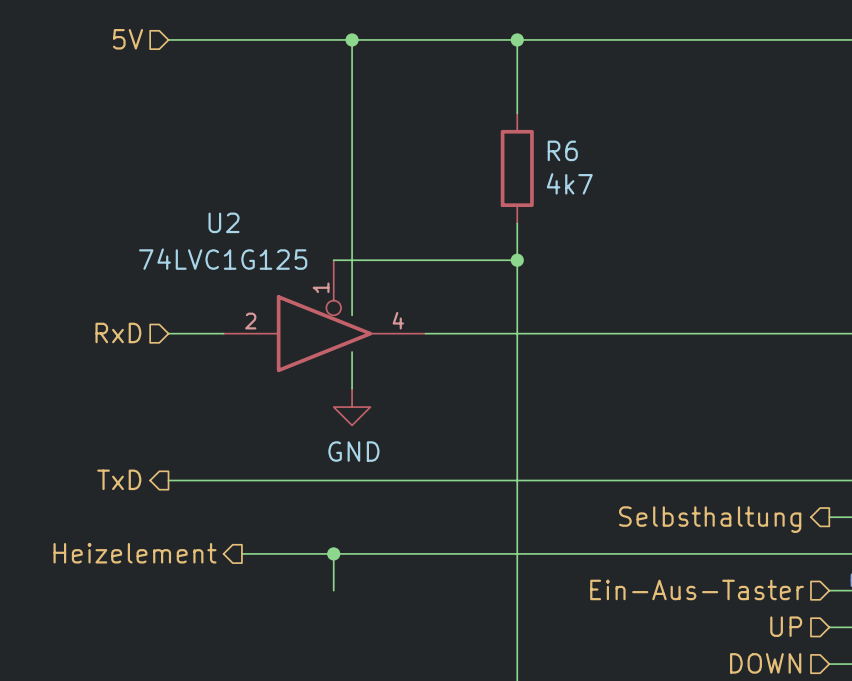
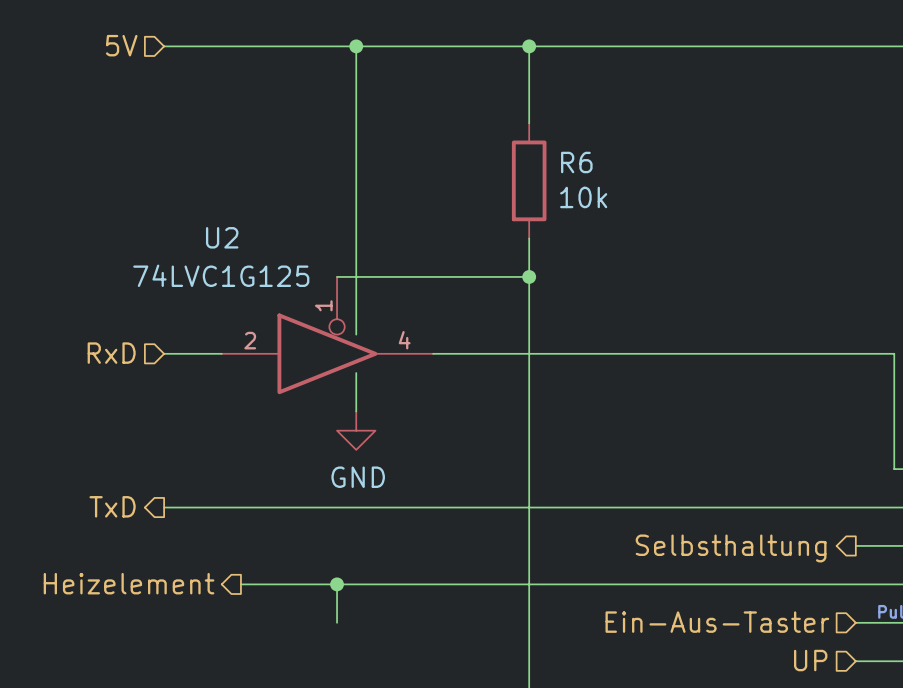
R6 value: 4k7 (569, 183) -> 10k (583, 197)

